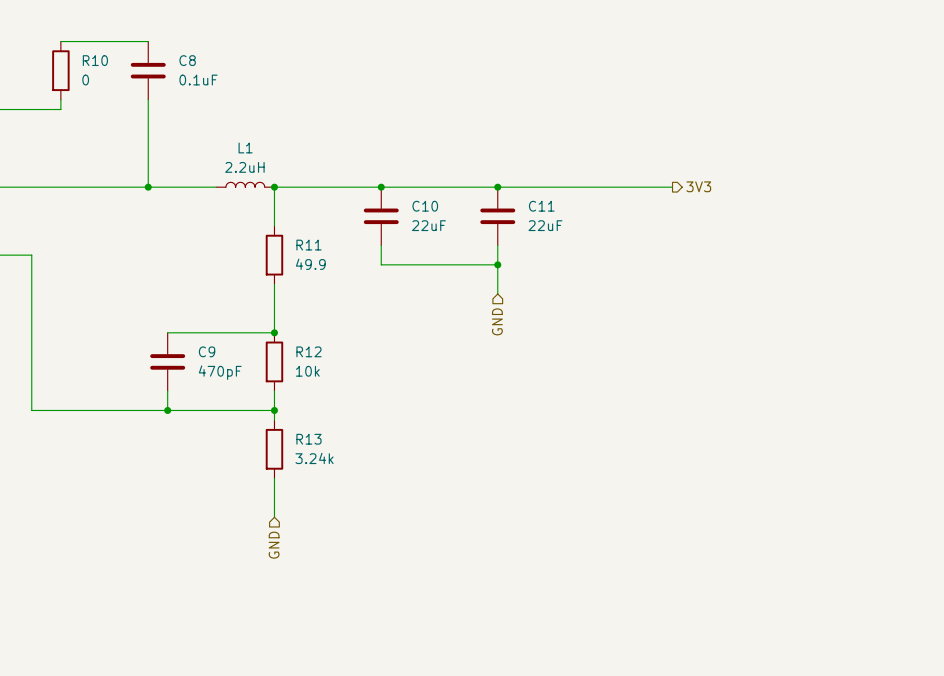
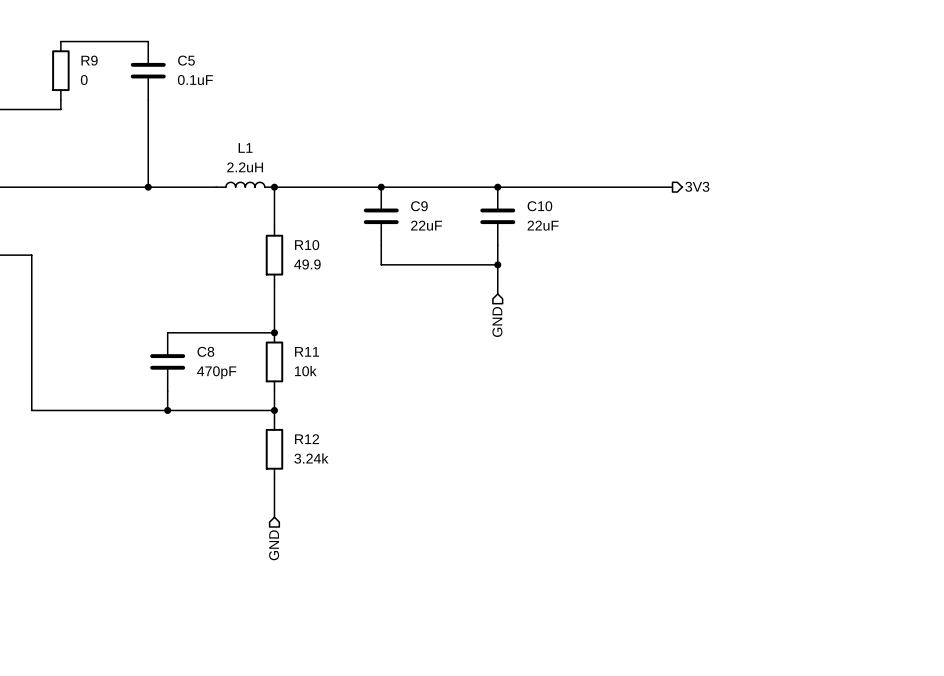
R10 name: R10 (95, 60) -> R9 (89, 60)
C8 name: C8 (187, 60) -> C5 (186, 60)
C10 name: C10 (425, 206) -> C9 (419, 206)
C11 name: C11 (541, 206) -> C10 (539, 206)
R11 name: R11 (308, 245) -> R10 (307, 245)
C9 name: C9 (207, 351) -> C8 (205, 351)
R12 name: R12 (308, 351) -> R11 (307, 351)
R13 name: R13 (308, 439) -> R12 (307, 439)

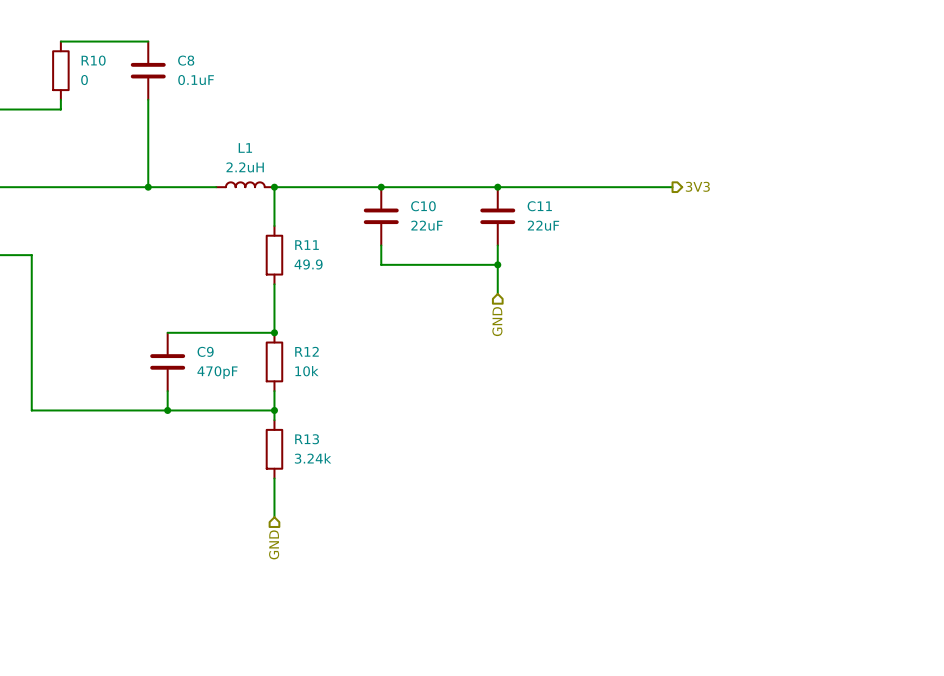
R9 name: R9 (89, 60) -> R10 (93, 60)
C5 name: C5 (186, 60) -> C8 (186, 60)
C9 name: C9 (419, 206) -> C10 (423, 206)
C10 name: C10 (539, 206) -> C11 (539, 206)
R10 name: R10 (307, 245) -> R11 (307, 245)
C8 name: C8 (205, 351) -> C9 (205, 351)
R11 name: R11 (307, 351) -> R12 (306, 351)
R12 name: R12 (307, 439) -> R13 (307, 439)

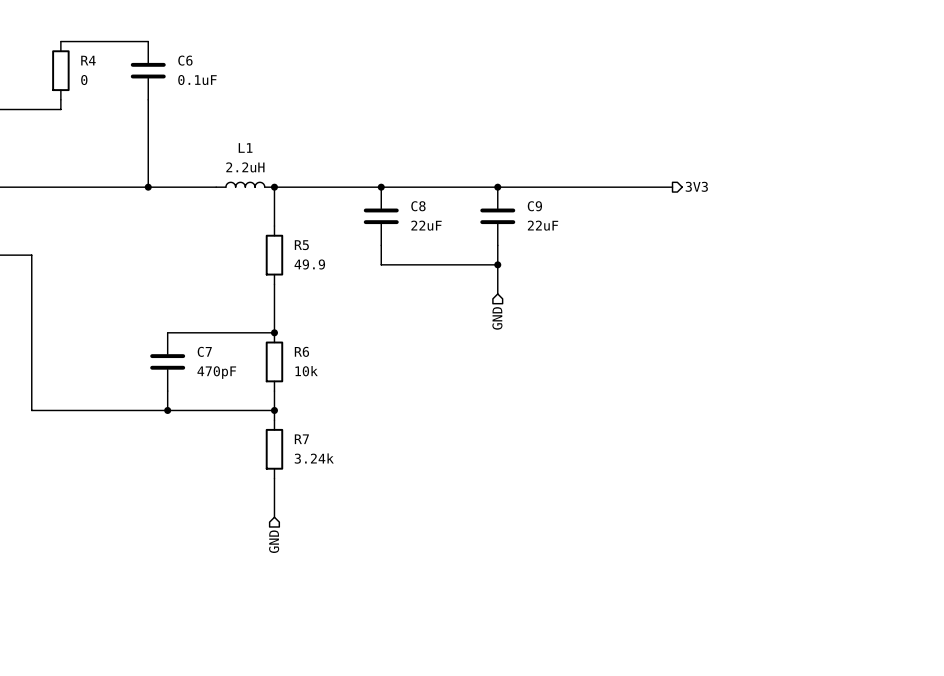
R10 name: R10 (93, 60) -> R4 (88, 60)
C8 name: C8 (186, 60) -> C6 (185, 60)
C10 name: C10 (423, 206) -> C8 (418, 206)
C11 name: C11 (539, 206) -> C9 (534, 206)
R11 name: R11 (307, 245) -> R5 (301, 245)
C9 name: C9 (205, 351) -> C7 (204, 351)
R12 name: R12 (306, 351) -> R6 (301, 351)
R13 name: R13 (307, 439) -> R7 (301, 439)

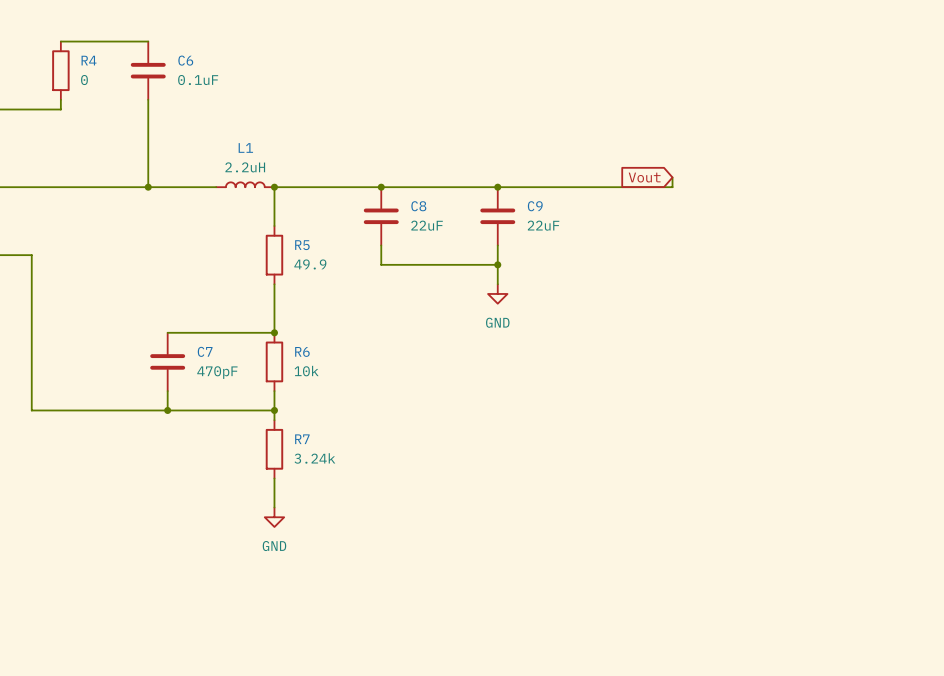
global label: none -> Vout (644, 177)
hierarchical label: 3V3 (696, 186) -> none
power symbol: none -> GND (497, 293)
hierarchical label: GND (497, 318) -> none
power symbol: none -> GND (274, 517)
hierarchical label: GND (274, 541) -> none

